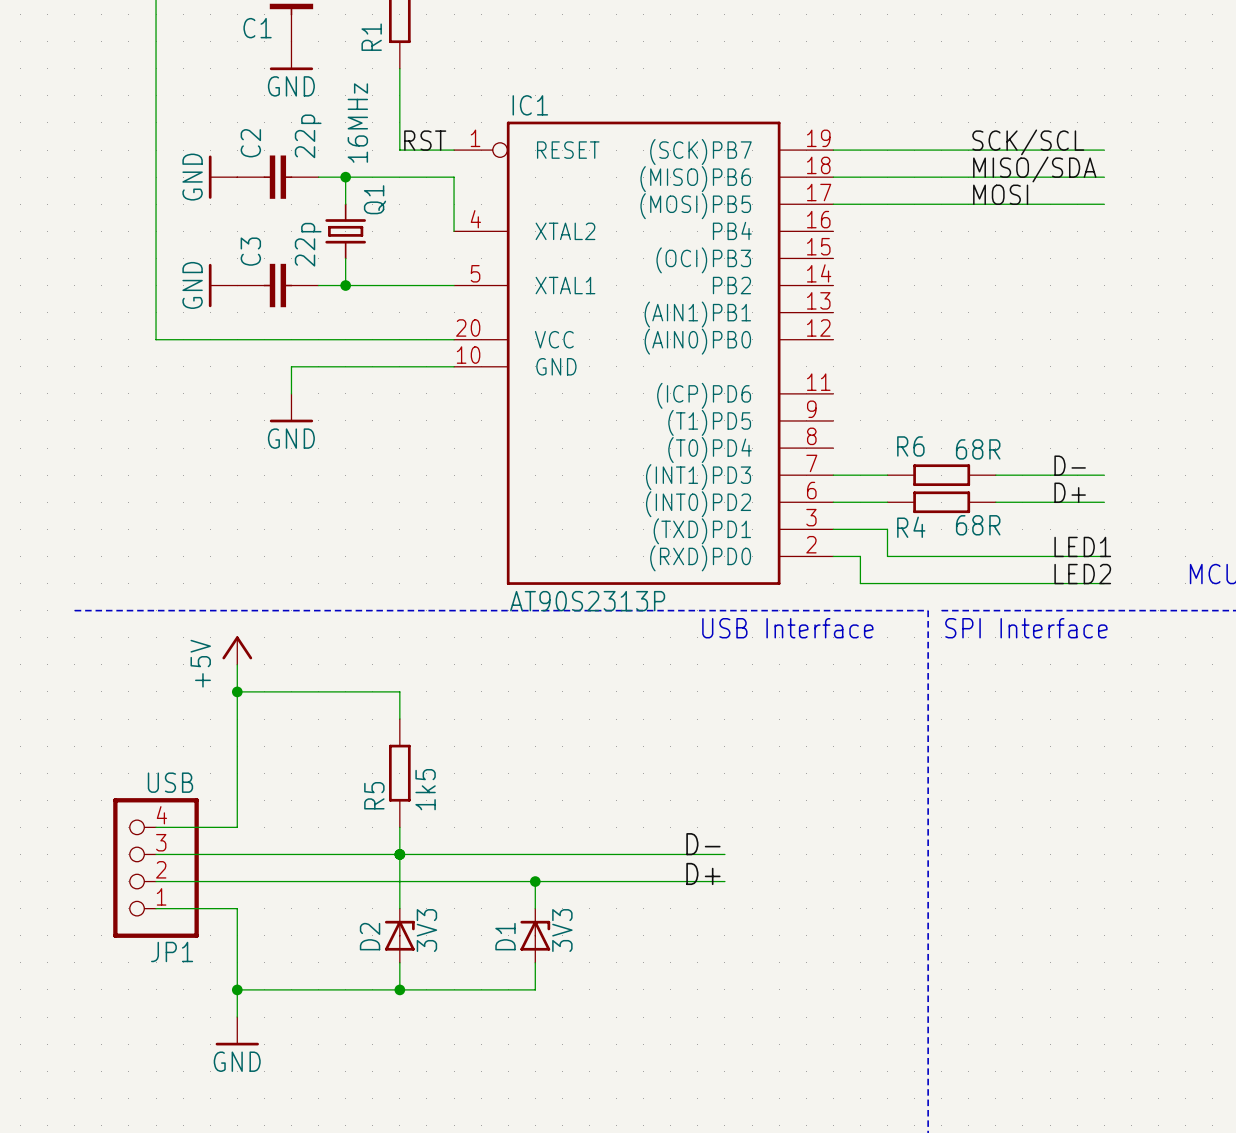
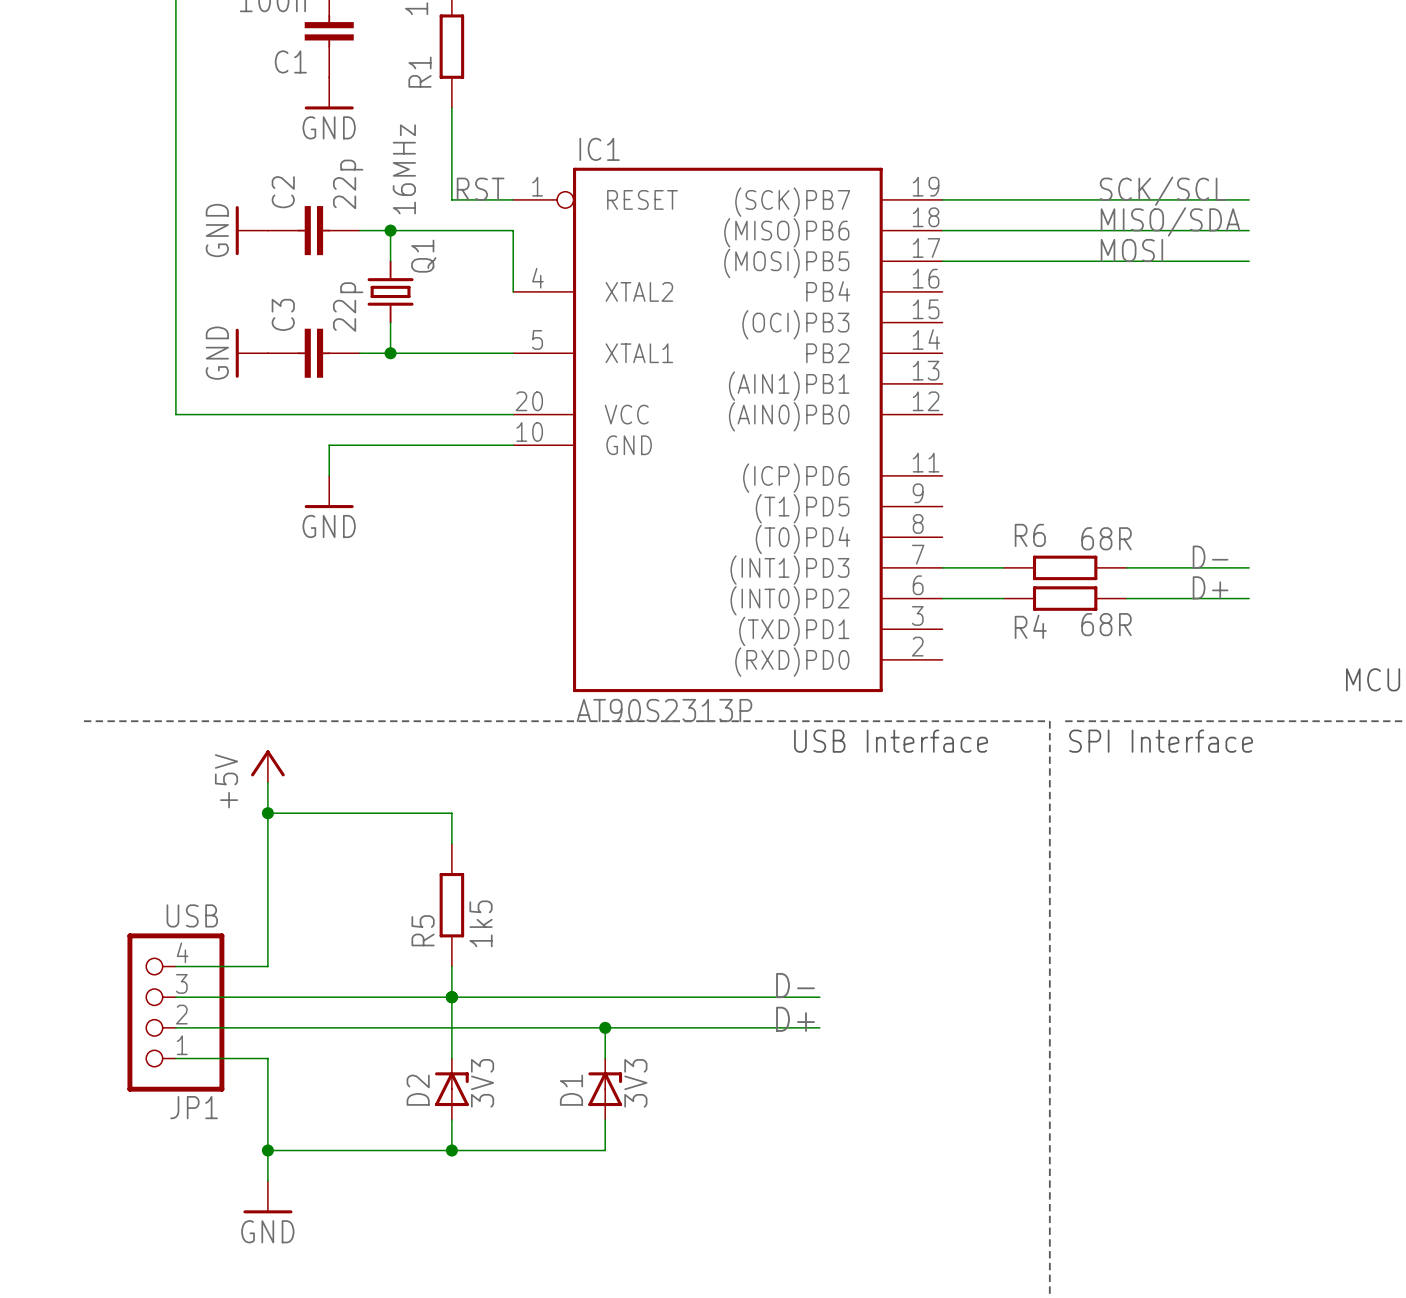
wire: (833, 529) (887, 529) (887, 556) (1104, 556) -> none
label: LED1 (1082, 546) -> none
wire: (833, 556) (860, 556) (860, 583) (1104, 583) -> none
label: LED2 (1082, 574) -> none

